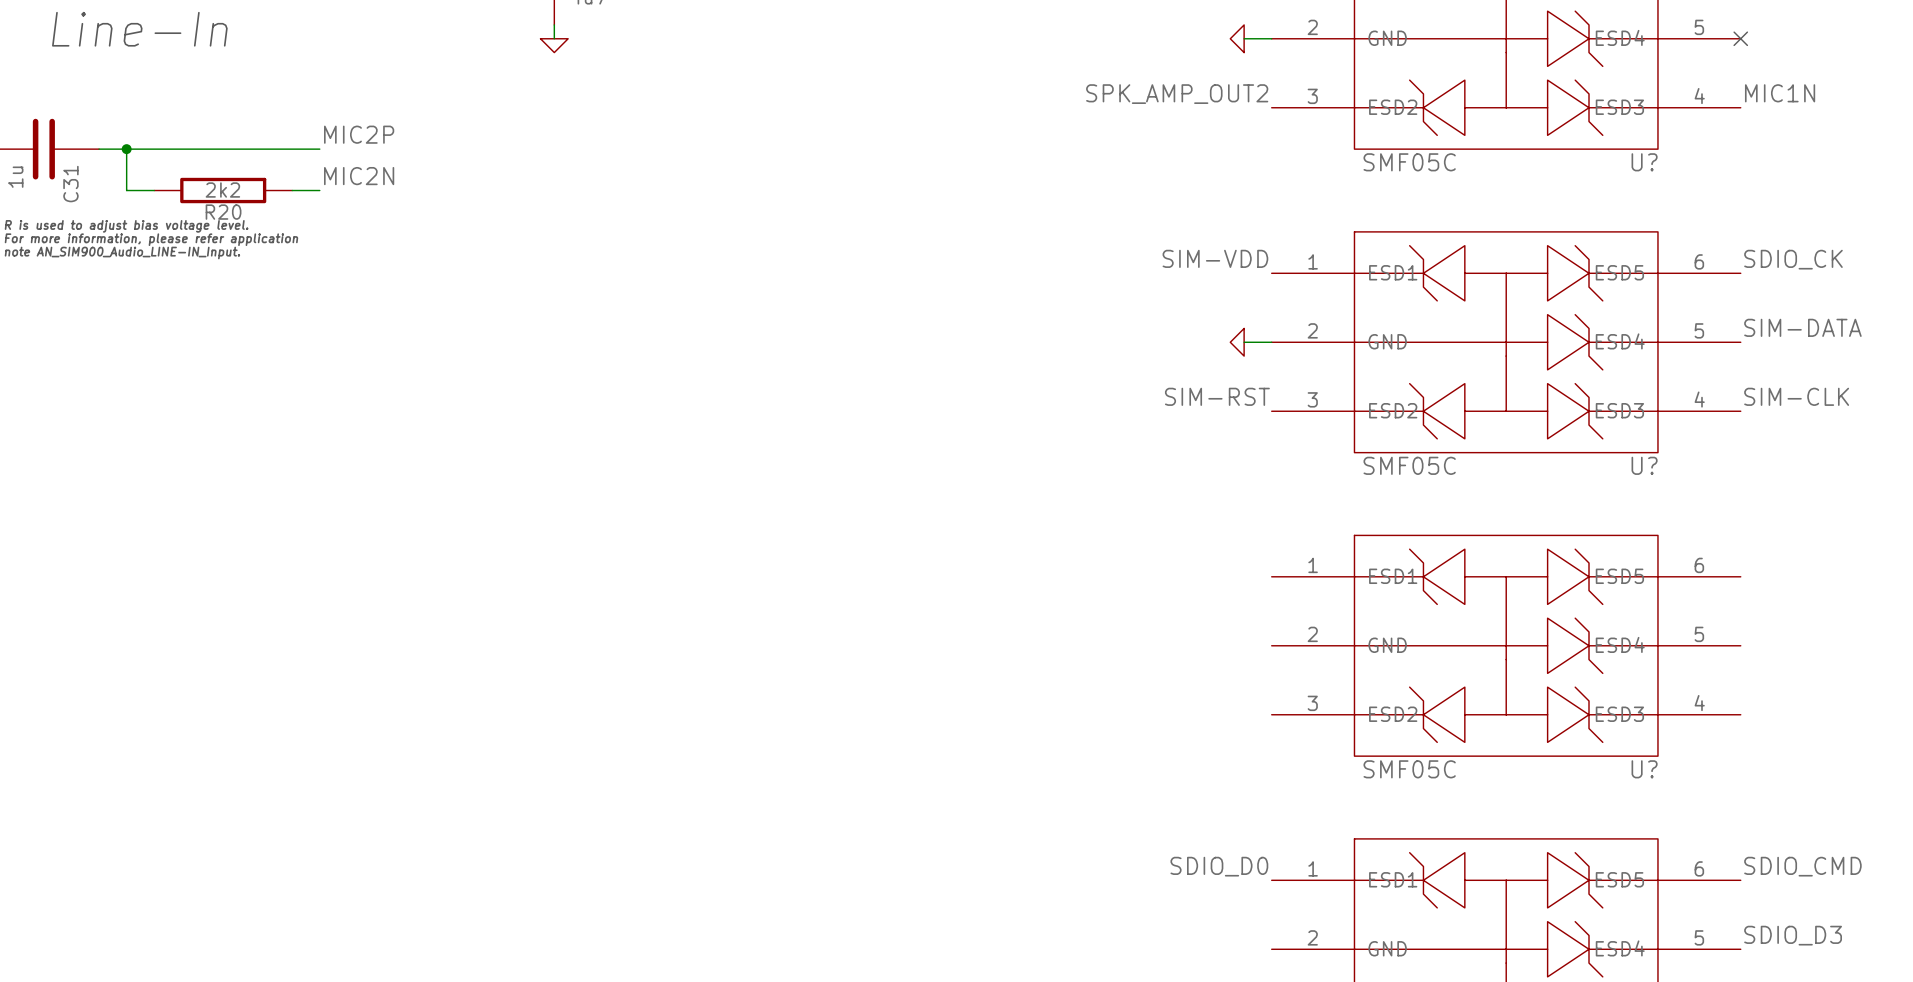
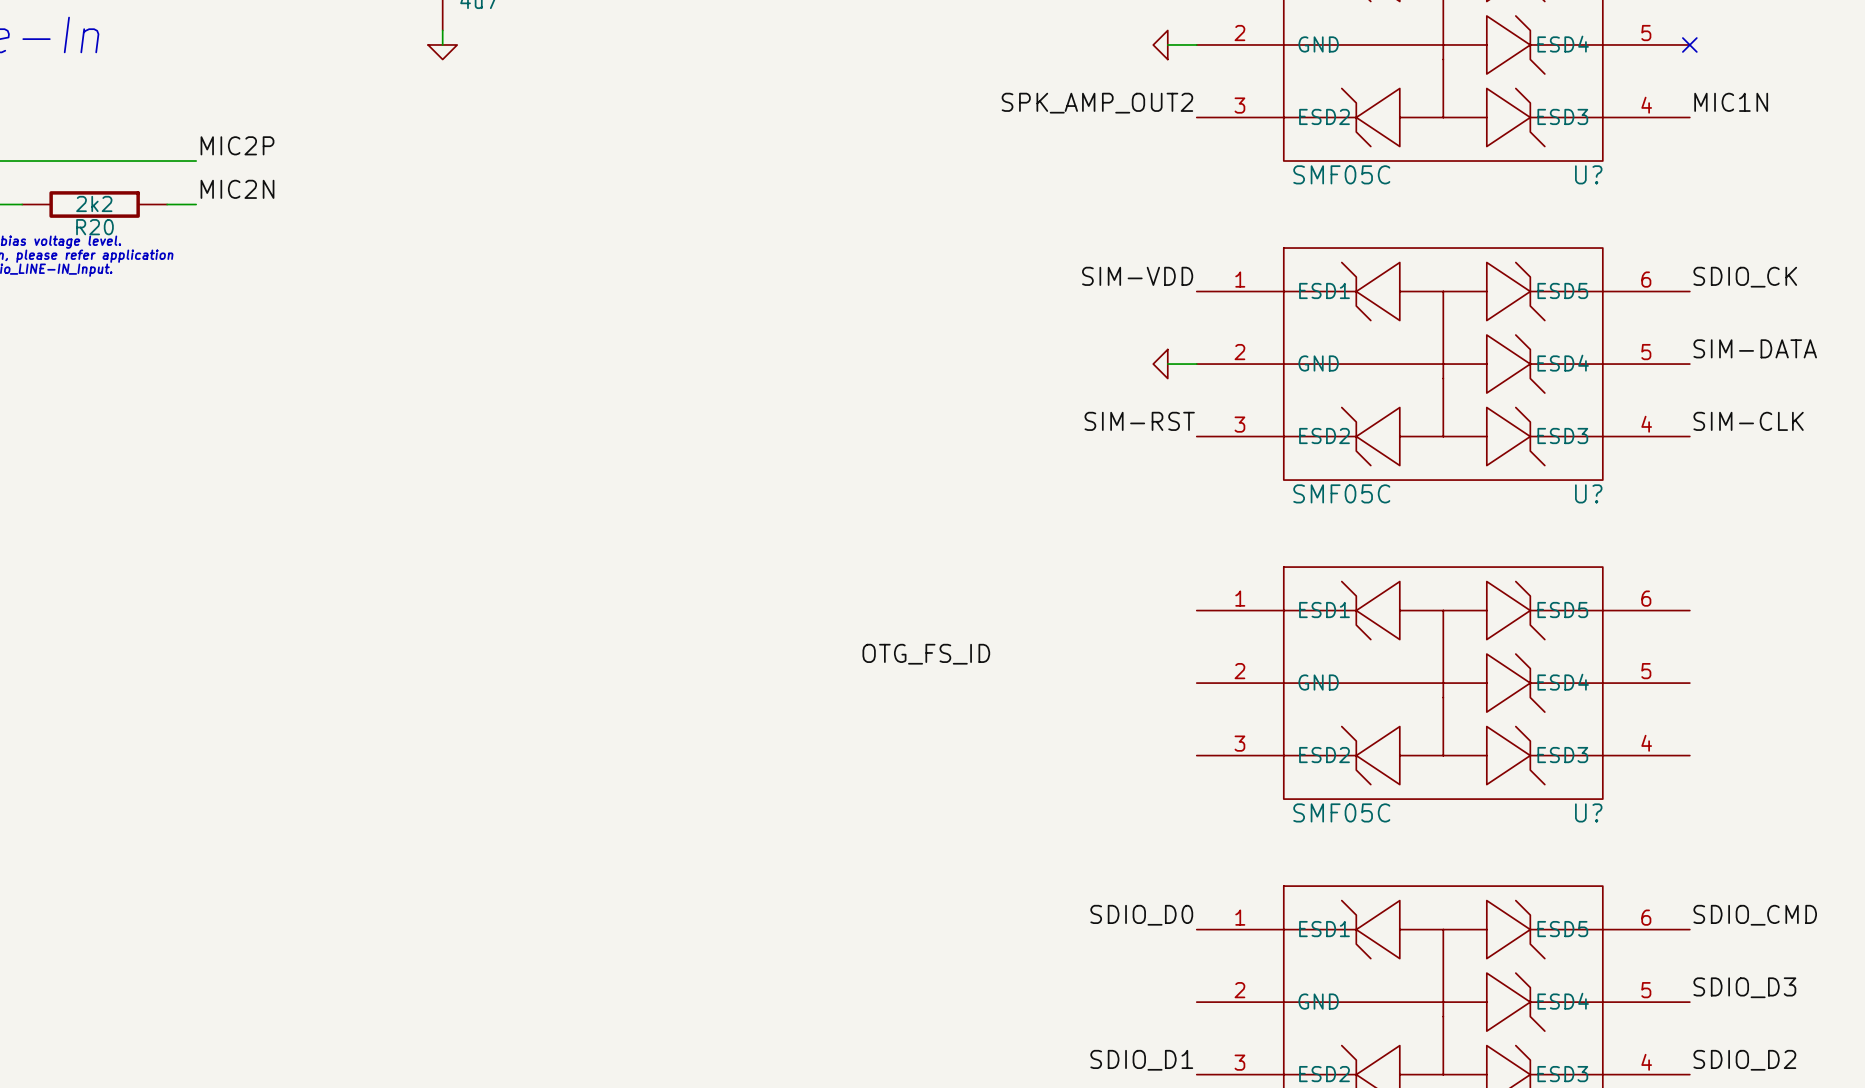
label: none -> OTG_FS_ID (926, 654)

